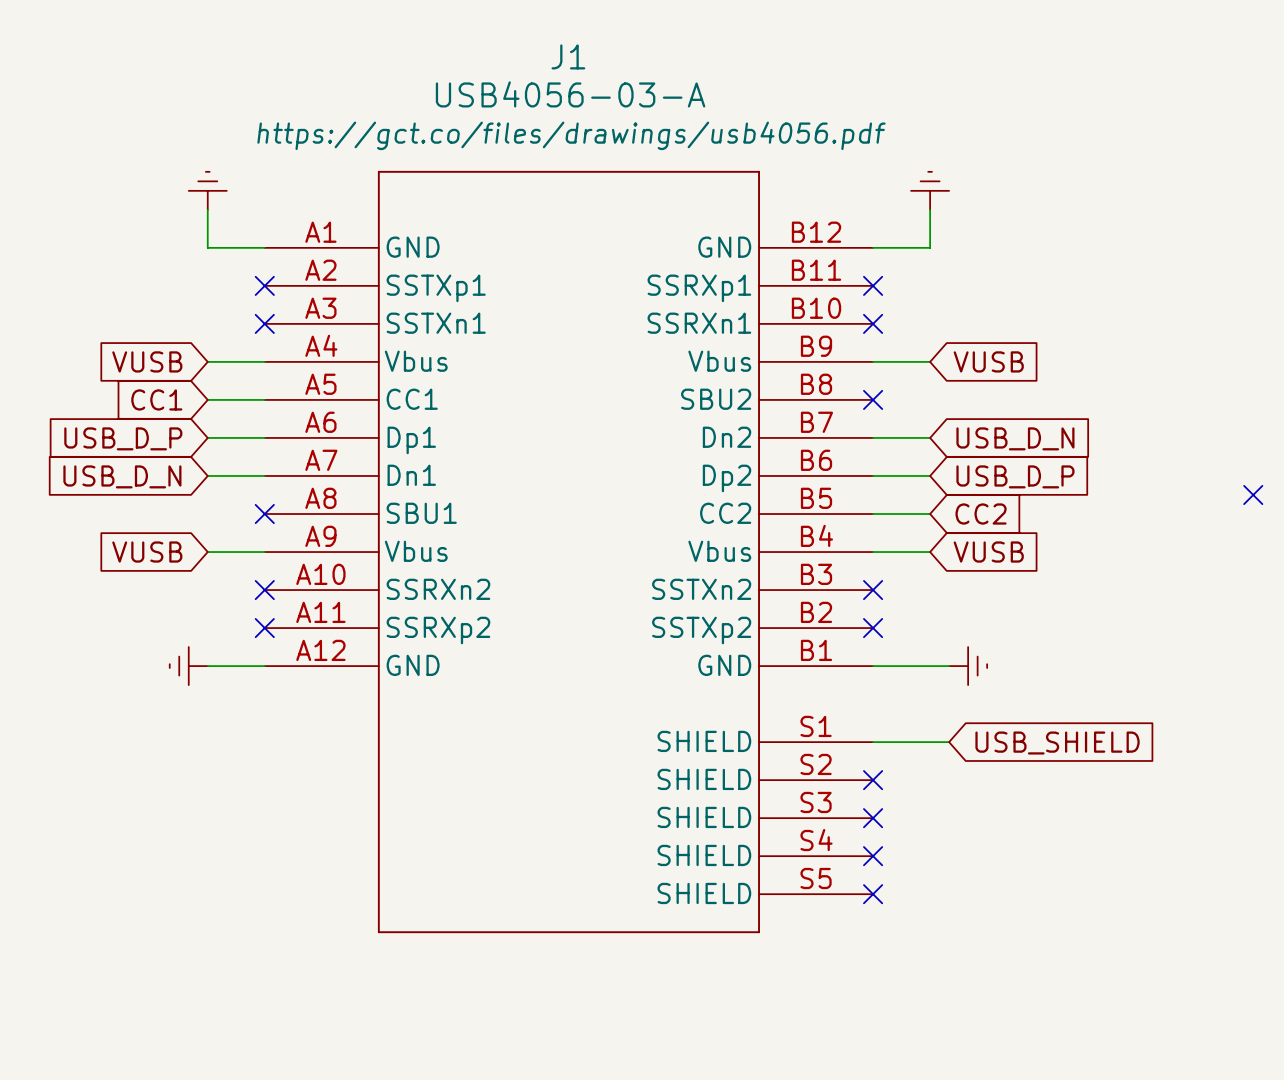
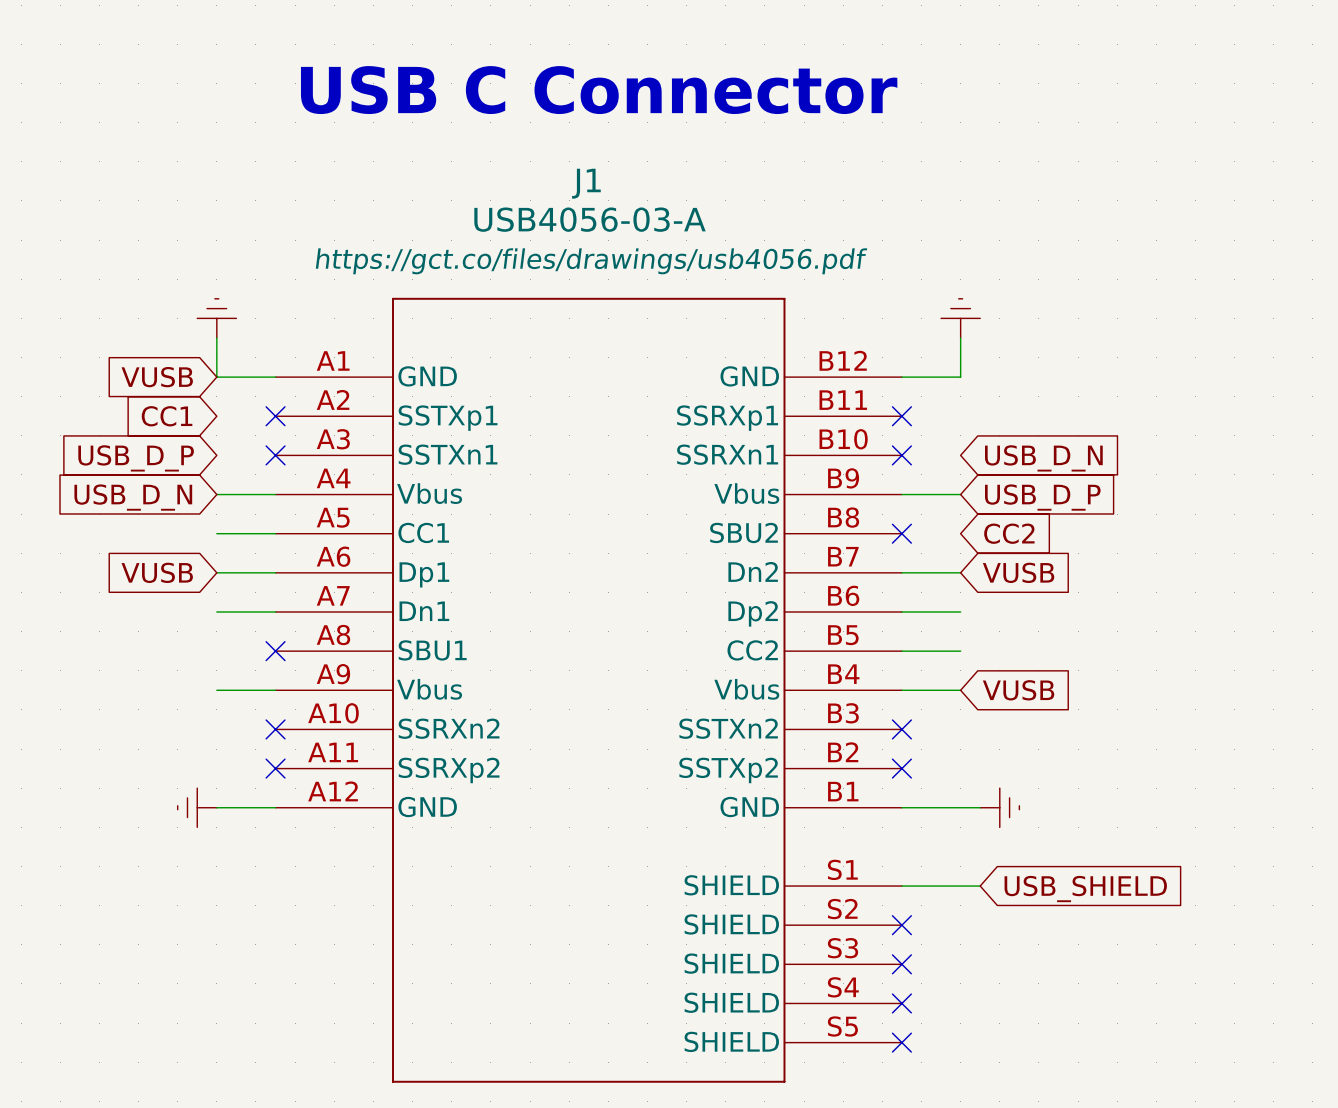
text: none -> USB C Connector (599, 90)
power symbol position: (207, 190) -> (216, 318)
power symbol position: (930, 190) -> (960, 318)
wire: (207, 209) (207, 247) (264, 247) -> none
wire: (930, 209) (930, 247) (873, 247) -> none
no-connect mark: (264, 285) -> none
no-connect mark: (873, 285) -> none
wire: none -> (216, 337) (216, 377)
no-connect mark: (264, 323) -> none
no-connect mark: (873, 323) -> none
wire: none -> (960, 337) (960, 377)
global label position: VUSB (988, 361) -> VUSB (1018, 690)
wire: (207, 399) (264, 399) -> (216, 533) (275, 533)
no-connect mark: none -> (275, 416)
wire: (207, 437) (264, 437) -> (216, 611) (275, 611)
no-connect mark: none -> (275, 455)
wire: (873, 437) (930, 437) -> (901, 611) (960, 611)
no-connect mark: none -> (901, 455)
no-connect mark: (1253, 494) -> none
no-connect mark: (264, 514) -> none
wire: (873, 514) (930, 514) -> (901, 651) (960, 651)
no-connect mark: none -> (901, 533)
J1 position: (568, 552) -> (588, 690)
no-connect mark: (264, 590) -> none
no-connect mark: (873, 590) -> none
no-connect mark: (873, 628) -> none
power symbol position: (188, 666) -> (197, 807)
wire: (930, 666) (949, 666) -> none
power symbol position: (968, 666) -> (999, 807)
no-connect mark: none -> (275, 729)
no-connect mark: none -> (901, 729)
no-connect mark: none -> (275, 768)
wire: (873, 742) (949, 742) -> (901, 886) (980, 886)
no-connect mark: none -> (901, 768)
global label position: USB_SHIELD (1057, 743) -> USB_SHIELD (1085, 889)
wire: none -> (216, 807) (275, 807)
wire: none -> (901, 807) (980, 807)
no-connect mark: (873, 780) -> none
no-connect mark: (873, 818) -> none
no-connect mark: (873, 856) -> none
no-connect mark: none -> (901, 964)
no-connect mark: none -> (901, 1003)
no-connect mark: none -> (901, 1042)

